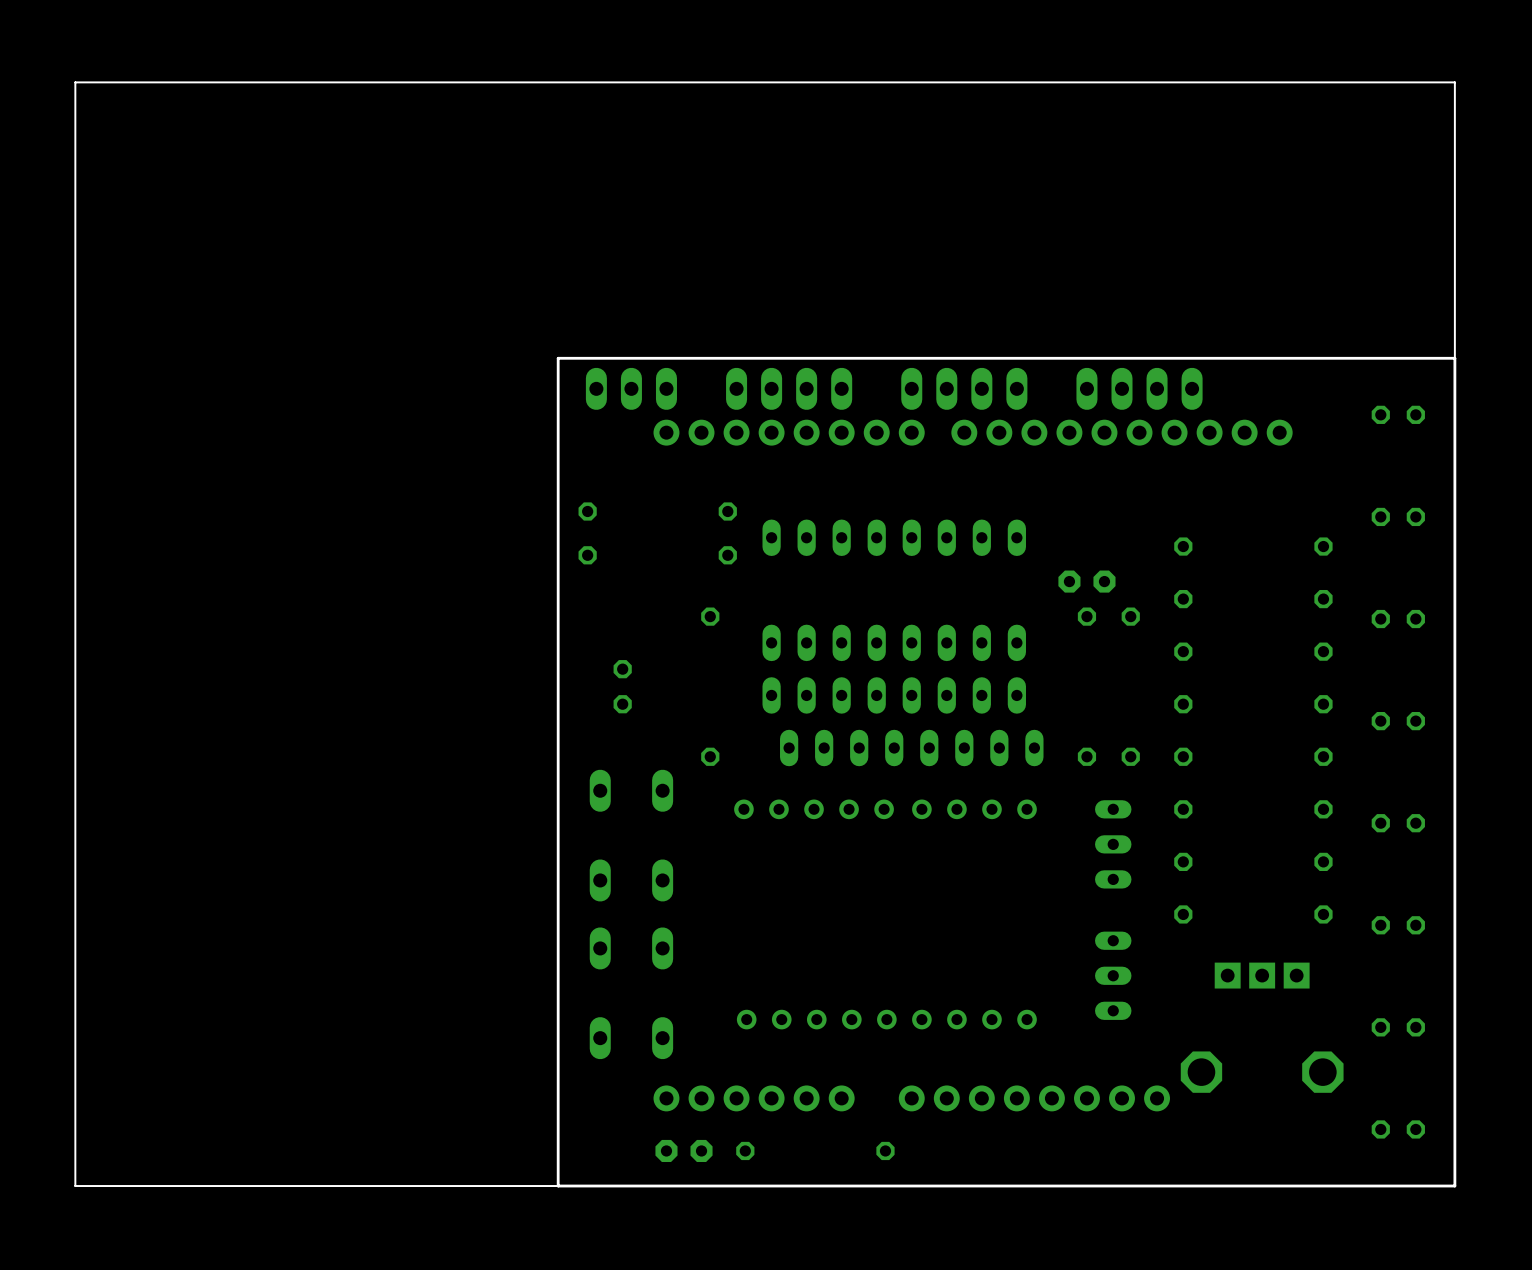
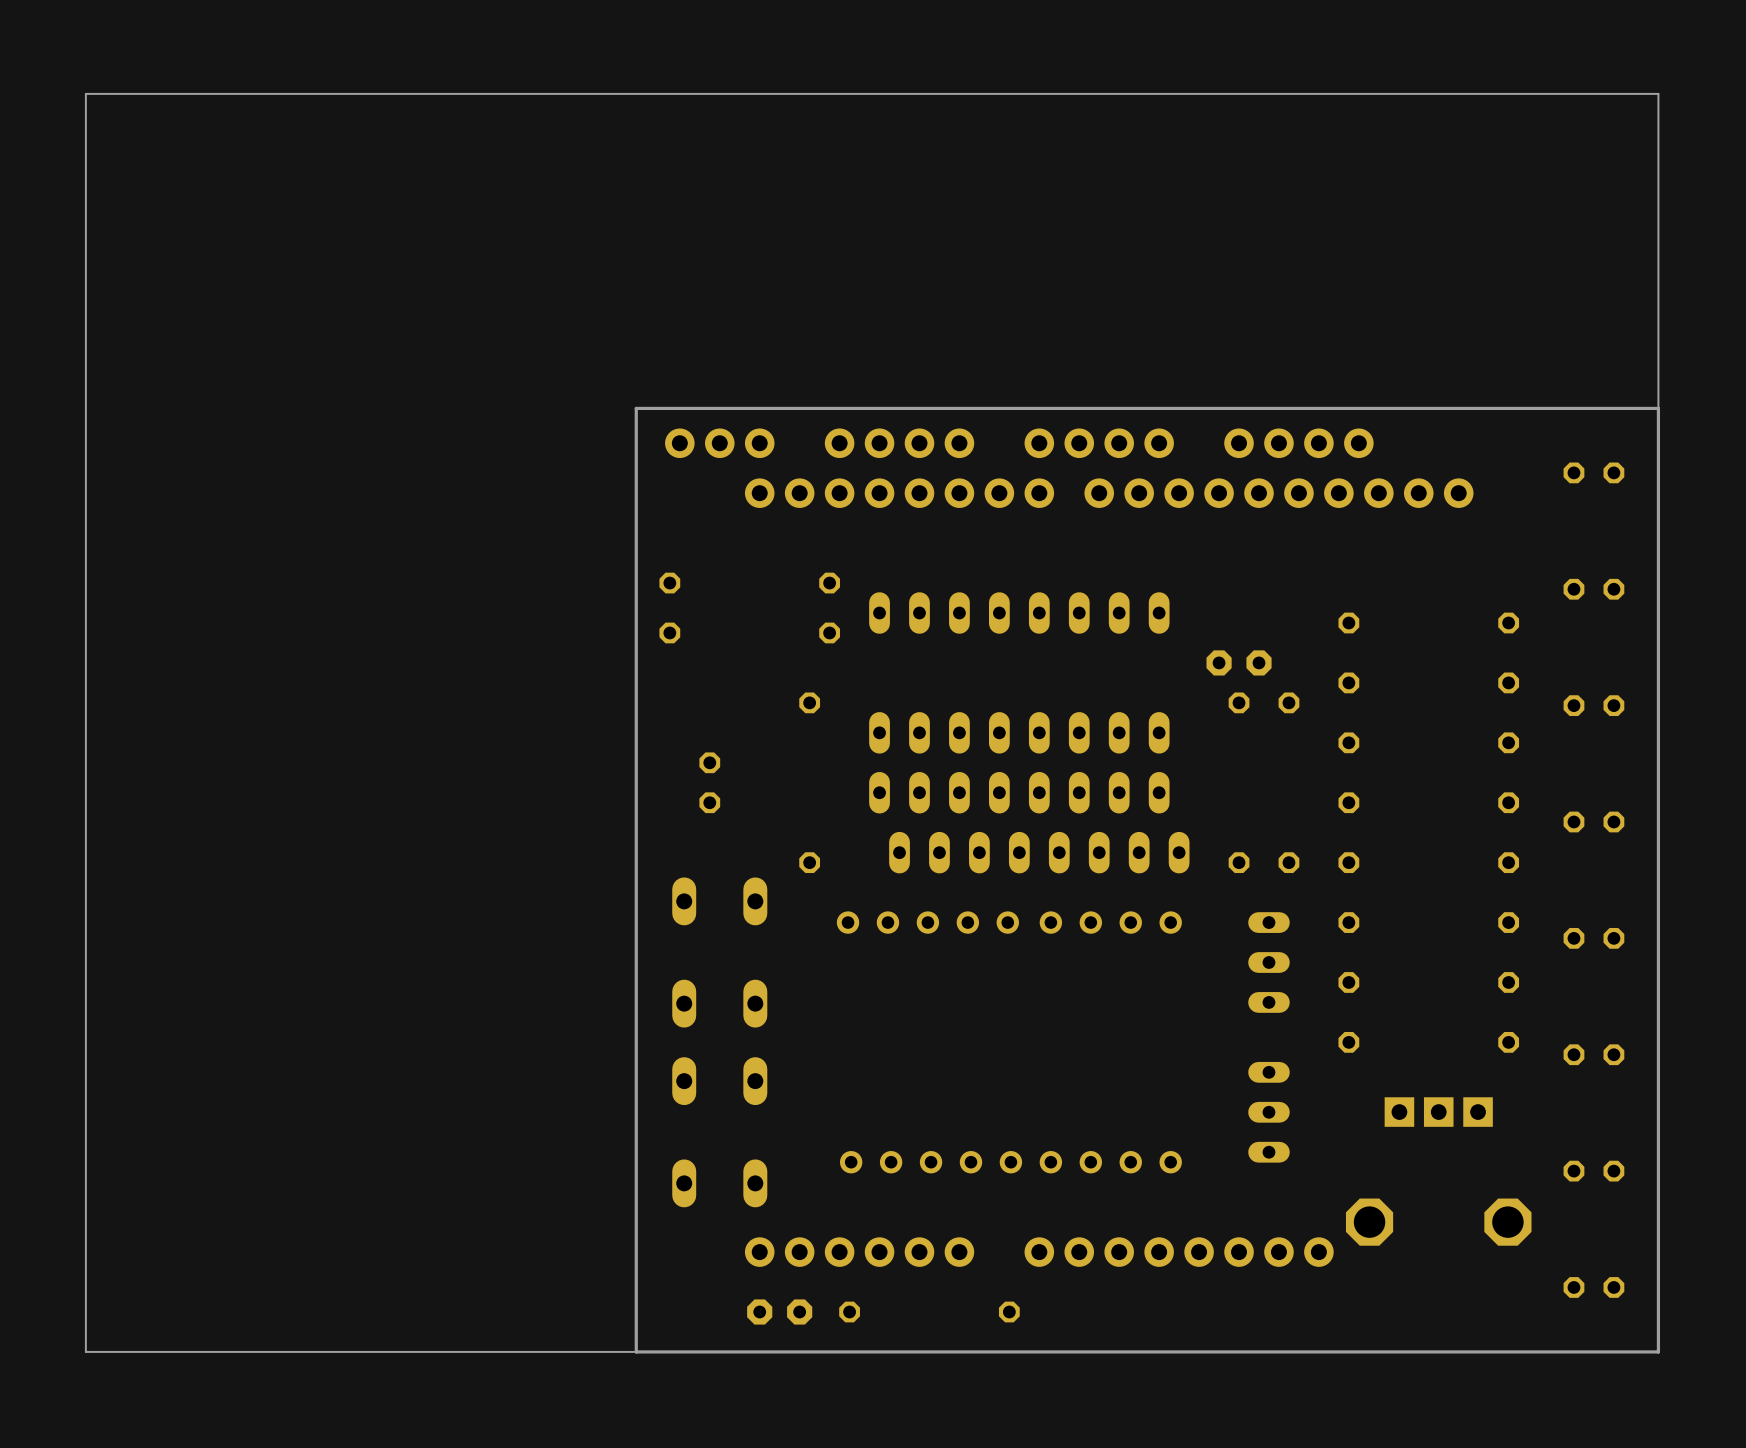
part footprint: [585, 367, 677, 410] -> [665, 428, 775, 459]
part footprint: [726, 367, 853, 410] -> [824, 428, 975, 459]
part footprint: [901, 367, 1028, 410] -> [1024, 428, 1174, 459]
part footprint: [1076, 367, 1203, 410] -> [1224, 428, 1374, 459]

